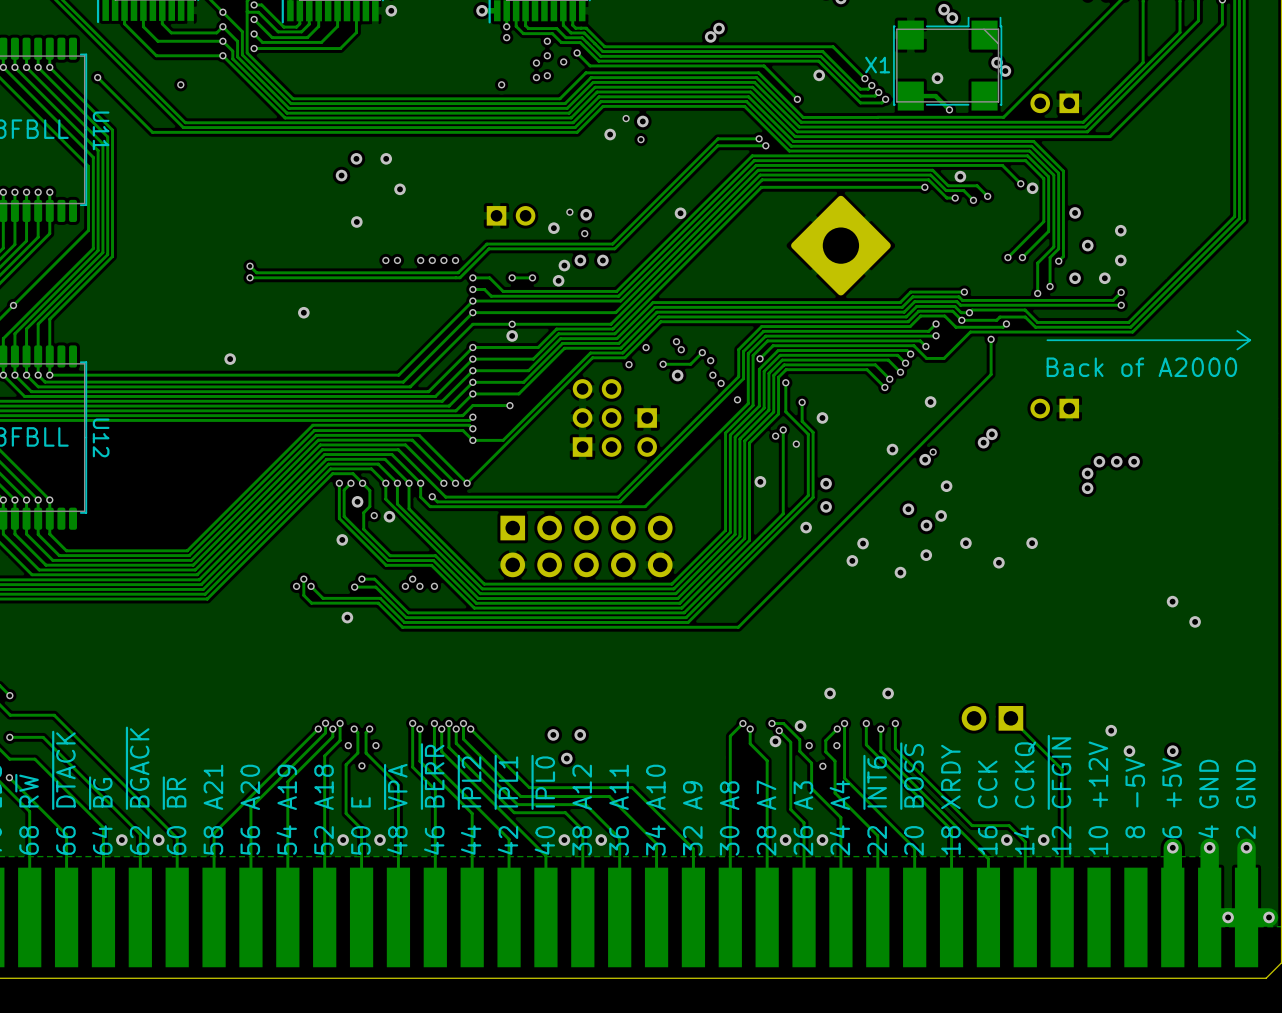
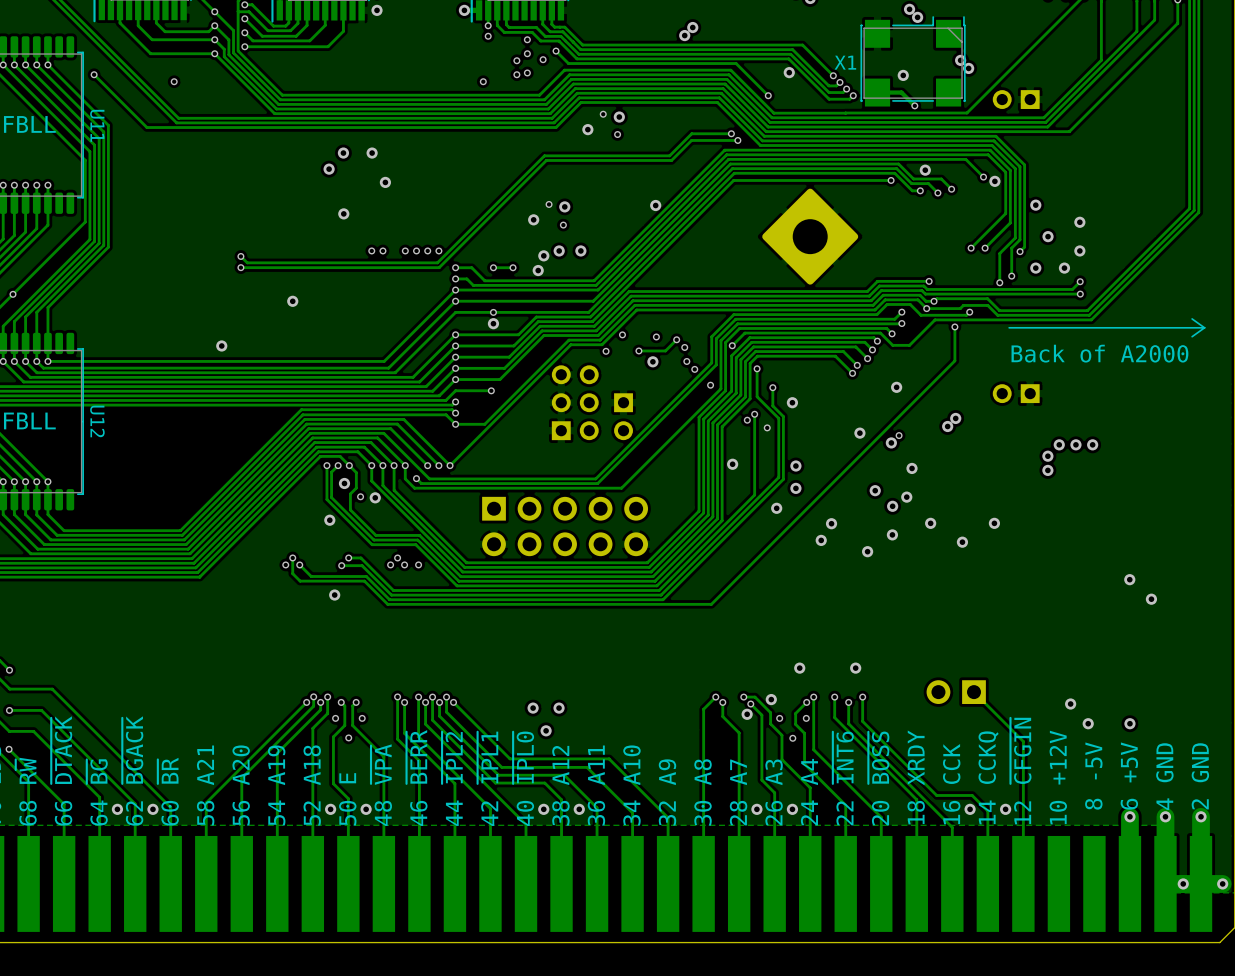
track: (695, 161) (612, 244) (486, 244) (458, 272) (454, 272) -> (669, 155) (544, 155) (437, 262)
track: (697, 166) (614, 248) (488, 248) (459, 277) (455, 277) -> (671, 160) (546, 160) (439, 267)
part: (511, 215) -> none
via: (676, 341) -> none

